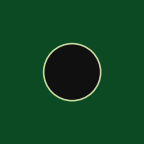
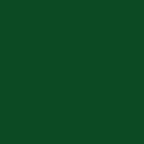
part: (72, 72) -> none

